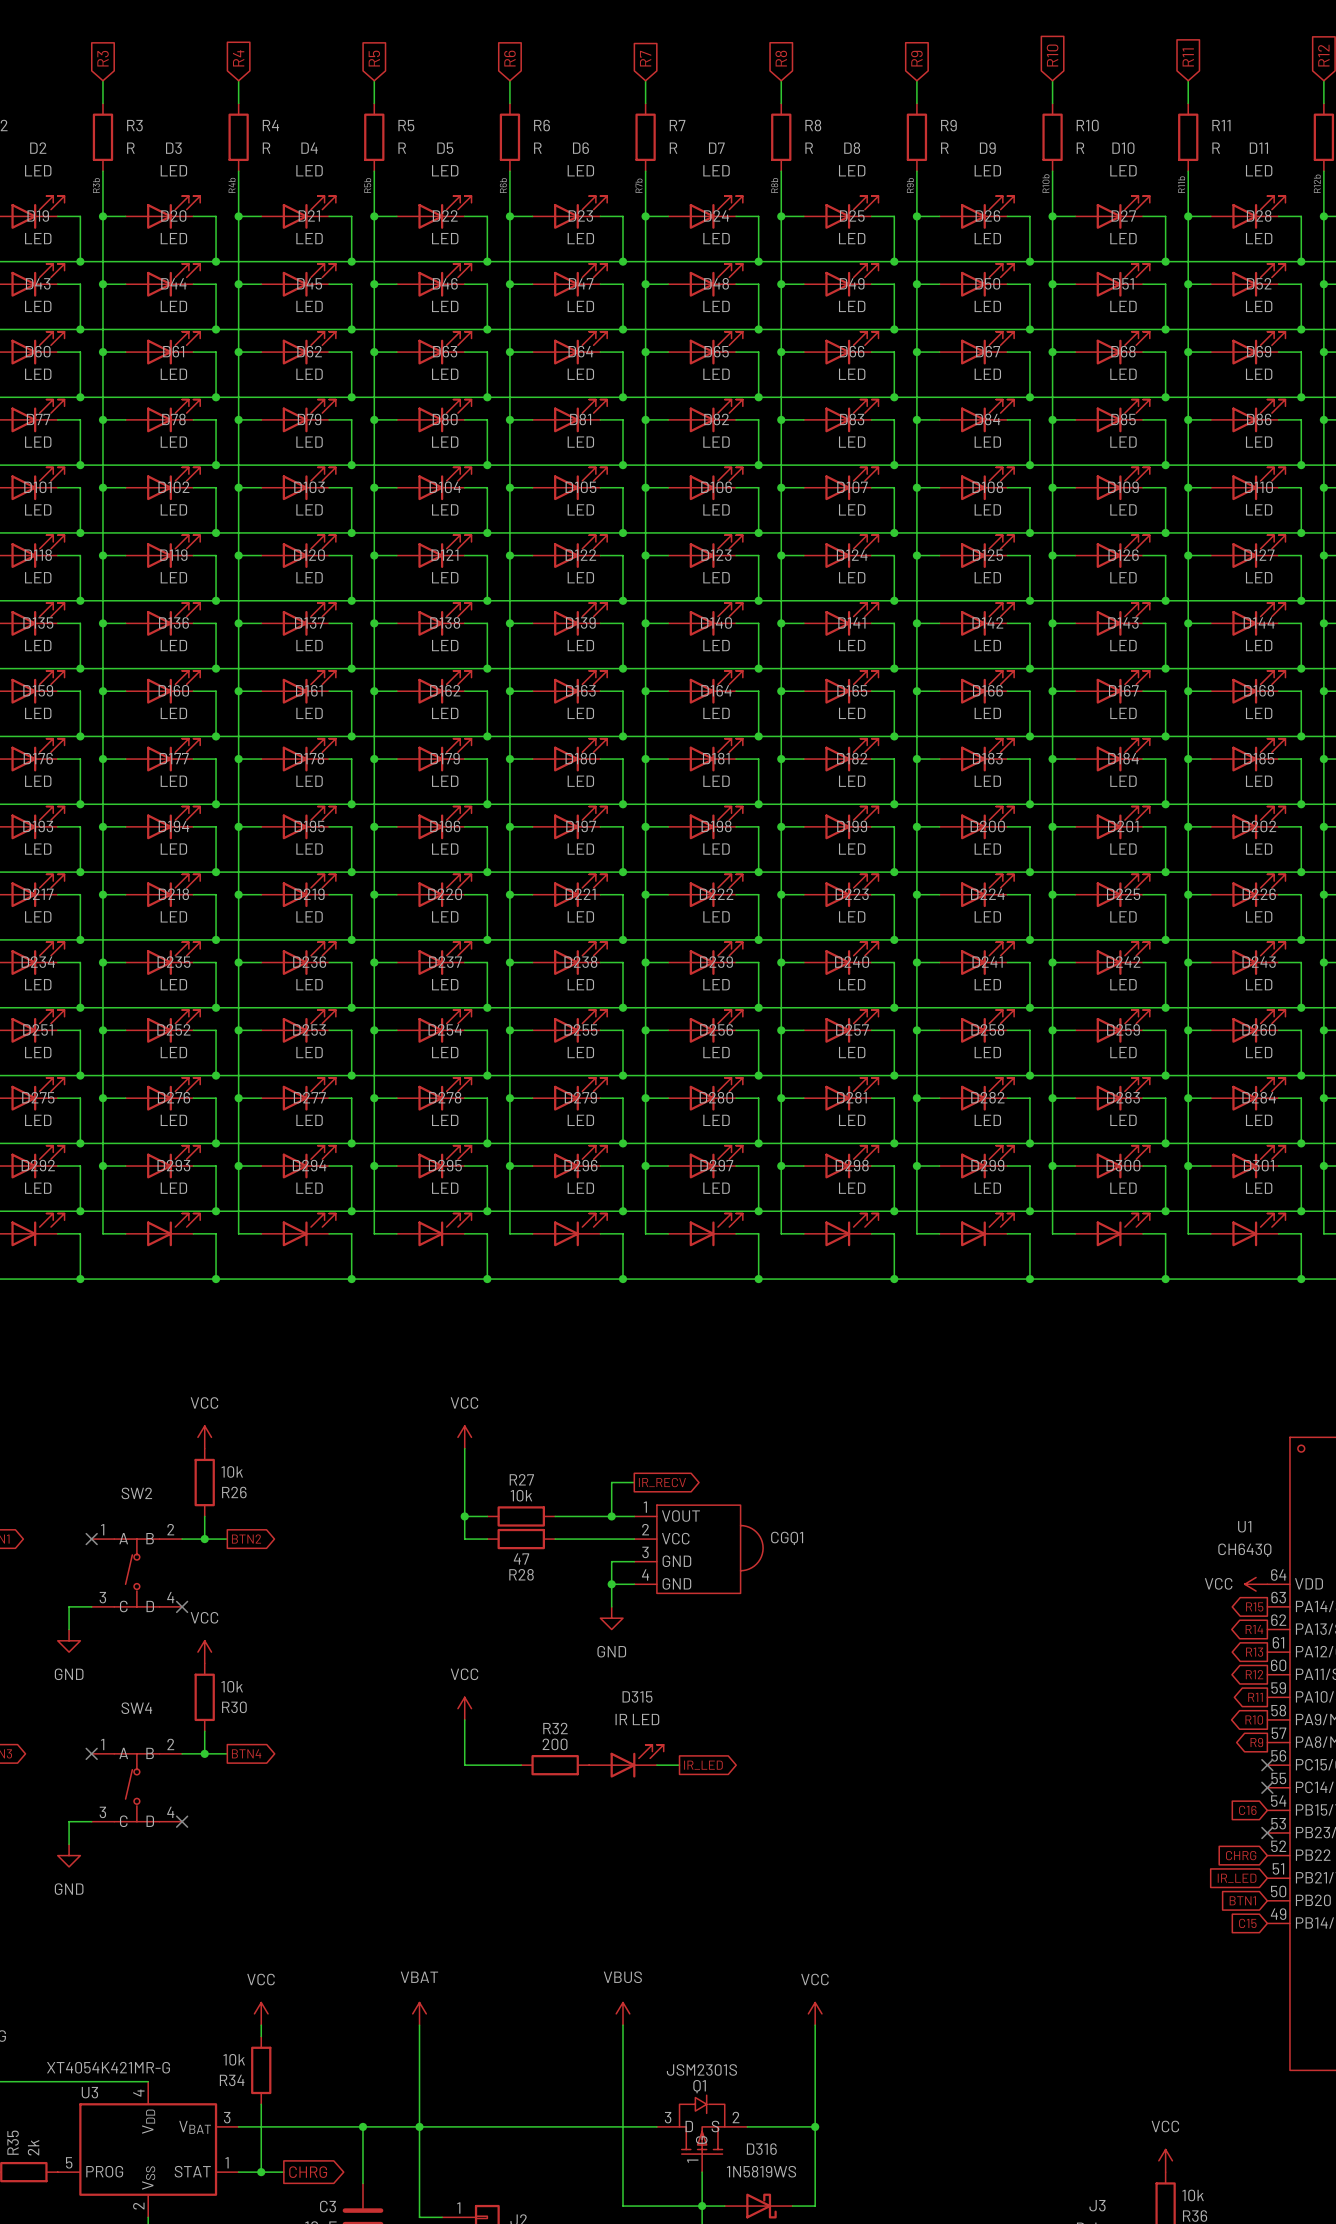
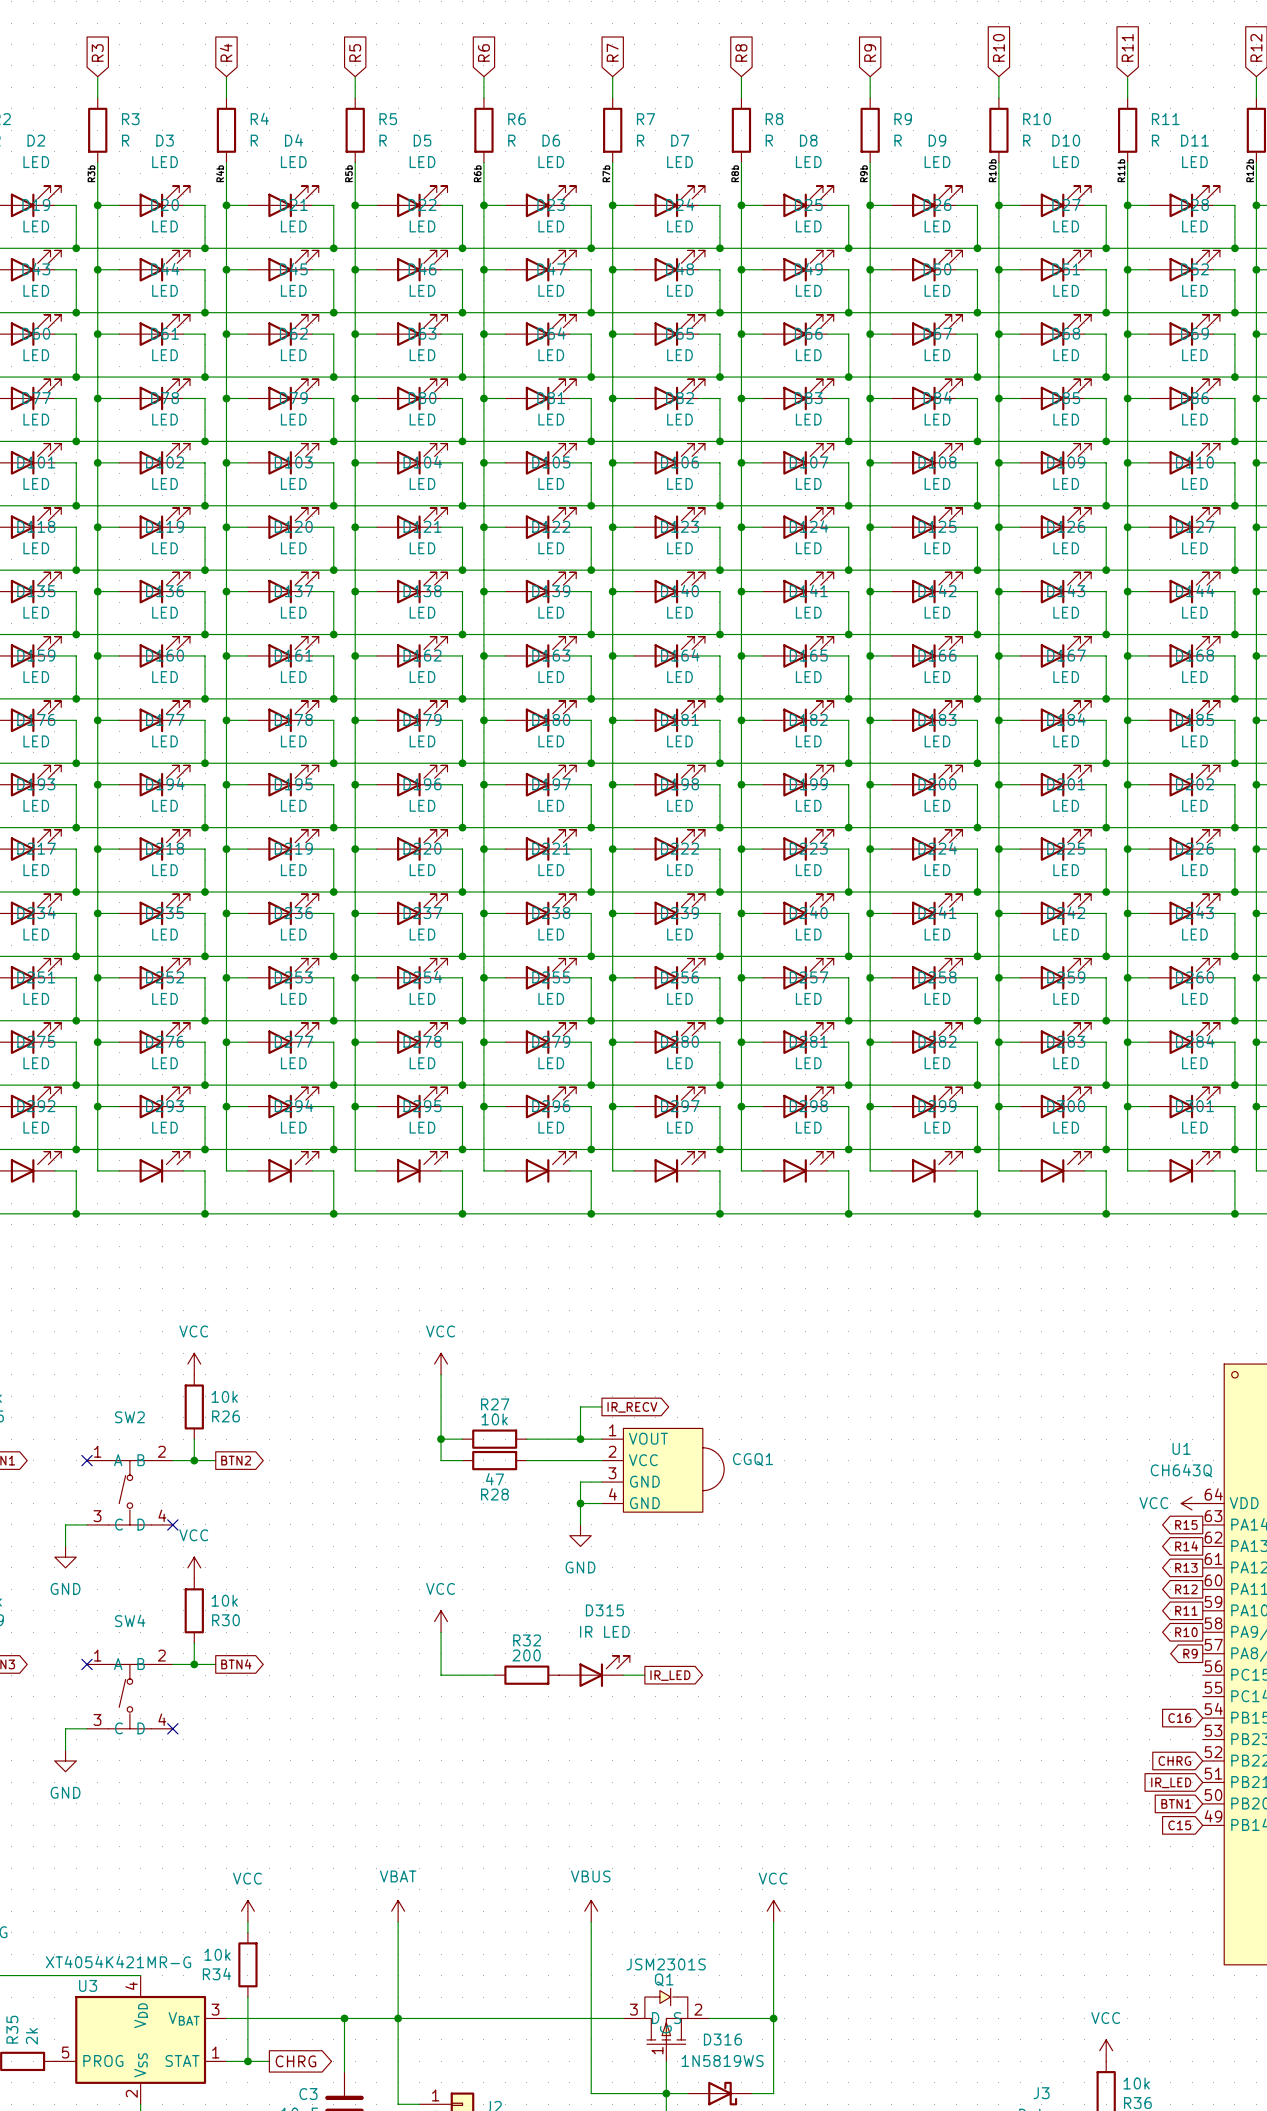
no-connect mark: (1267, 1765) -> none
no-connect mark: (1267, 1787) -> none
no-connect mark: (1267, 1832) -> none

